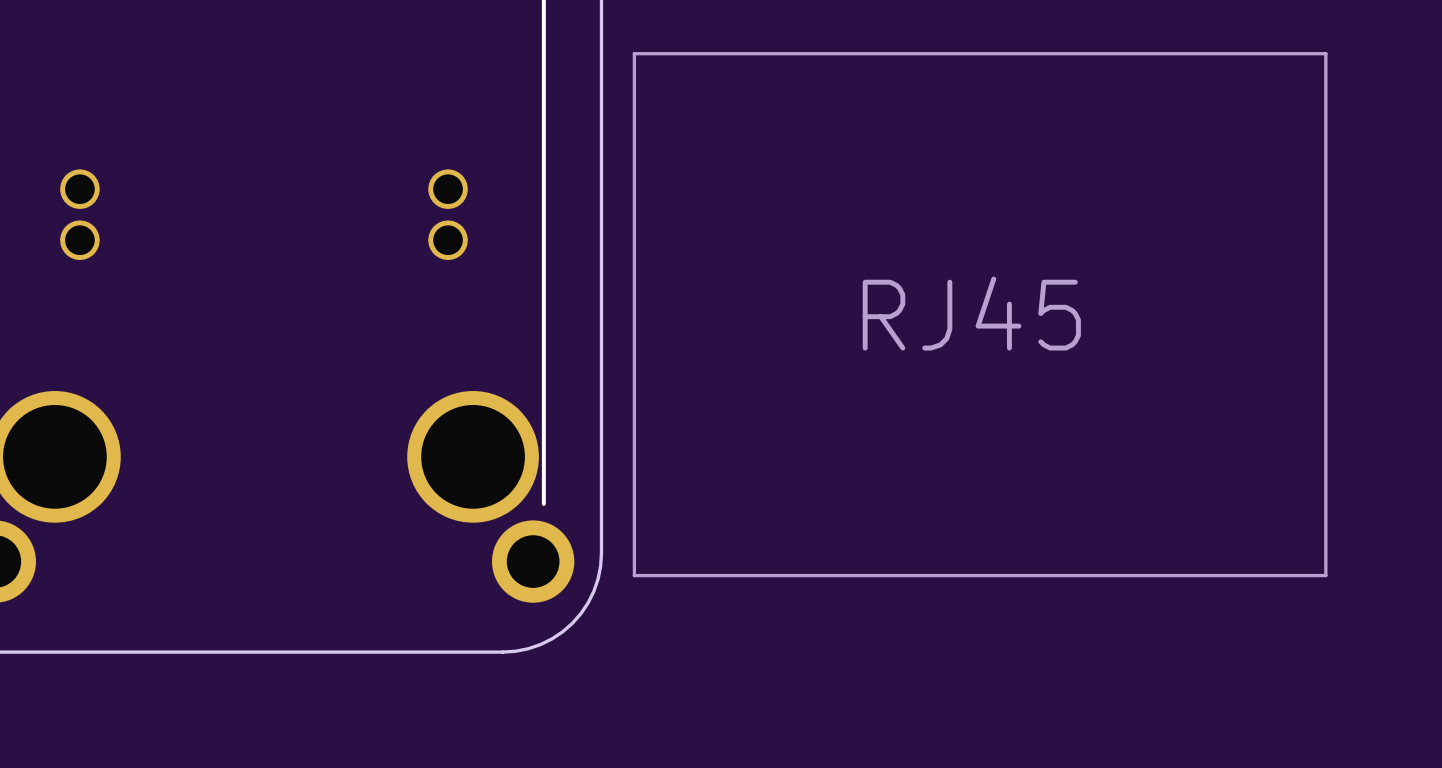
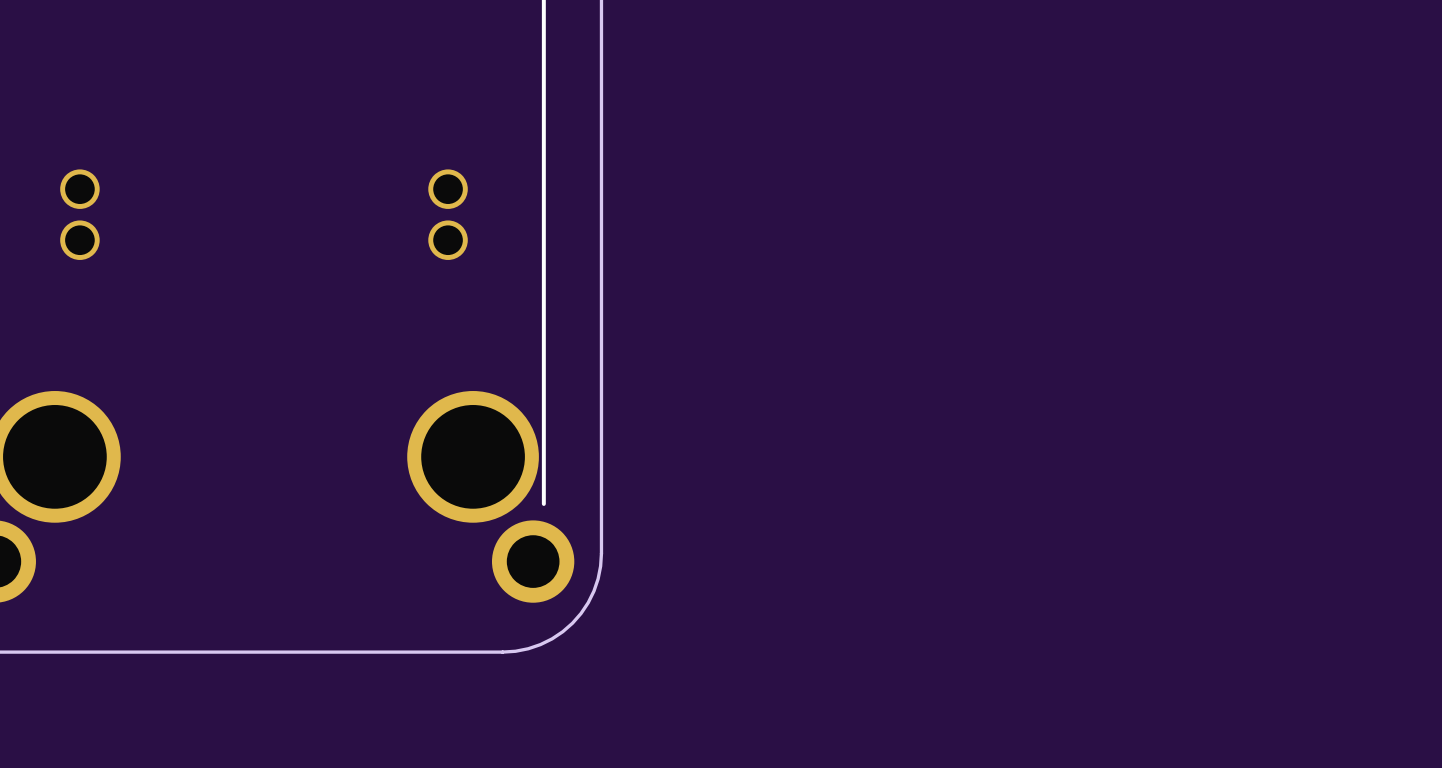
line: (634, 53) (634, 575) (1325, 575) (1325, 53) (634, 53) -> none
text: RJ45 (971, 313) -> none

